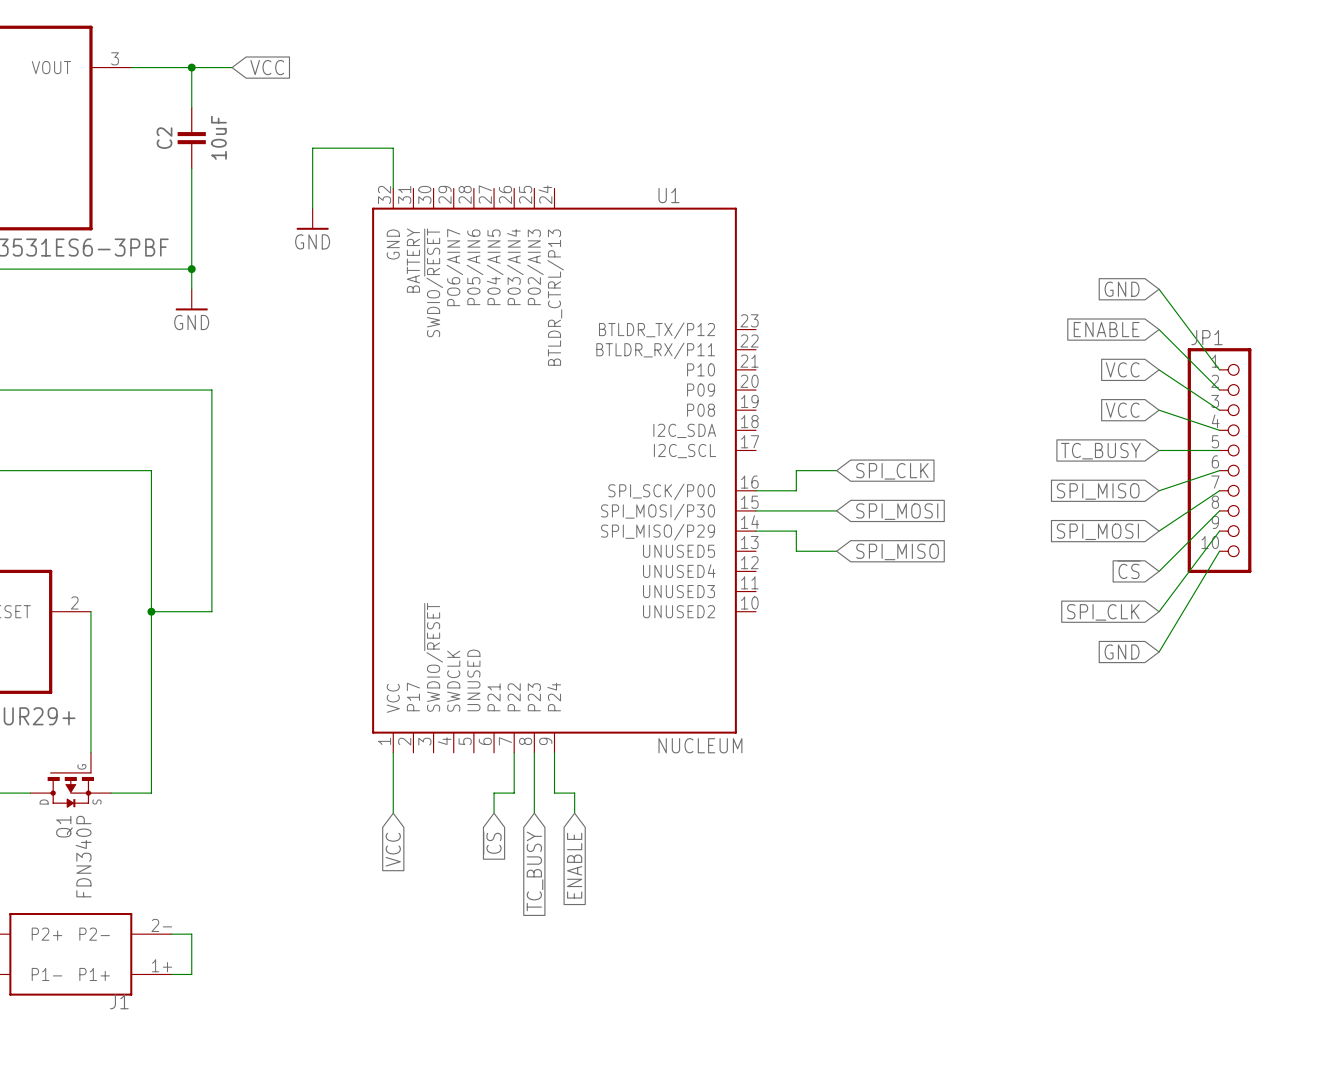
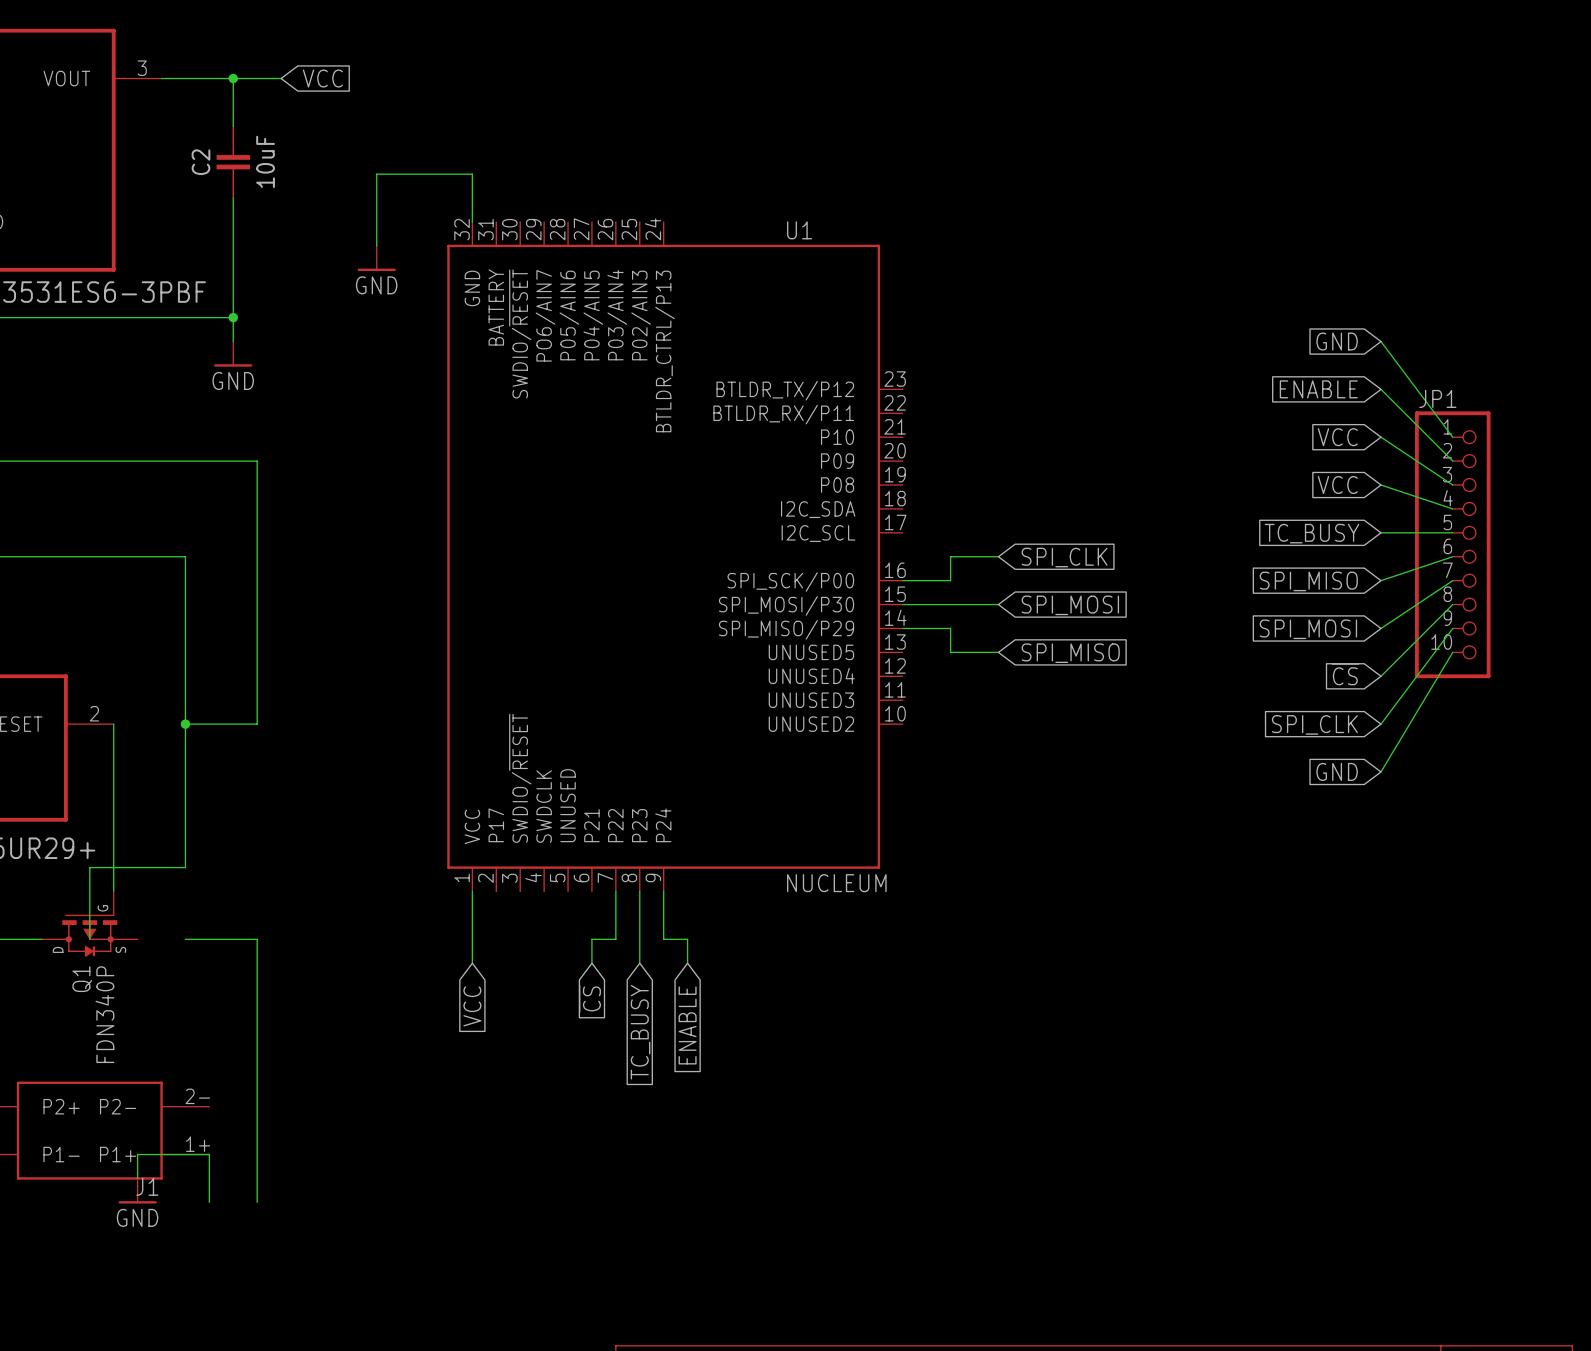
wire: (151, 732) (151, 793) (111, 793) -> (185, 867) (89, 867) (89, 939)
wire: none -> (185, 939) (257, 939) (257, 1202)
wire: (171, 934) (191, 934) (191, 974) (171, 974) -> none
wire: none -> (137, 1178) (137, 1154) (209, 1154) (209, 1202)
power symbol: none -> GND (137, 1190)

